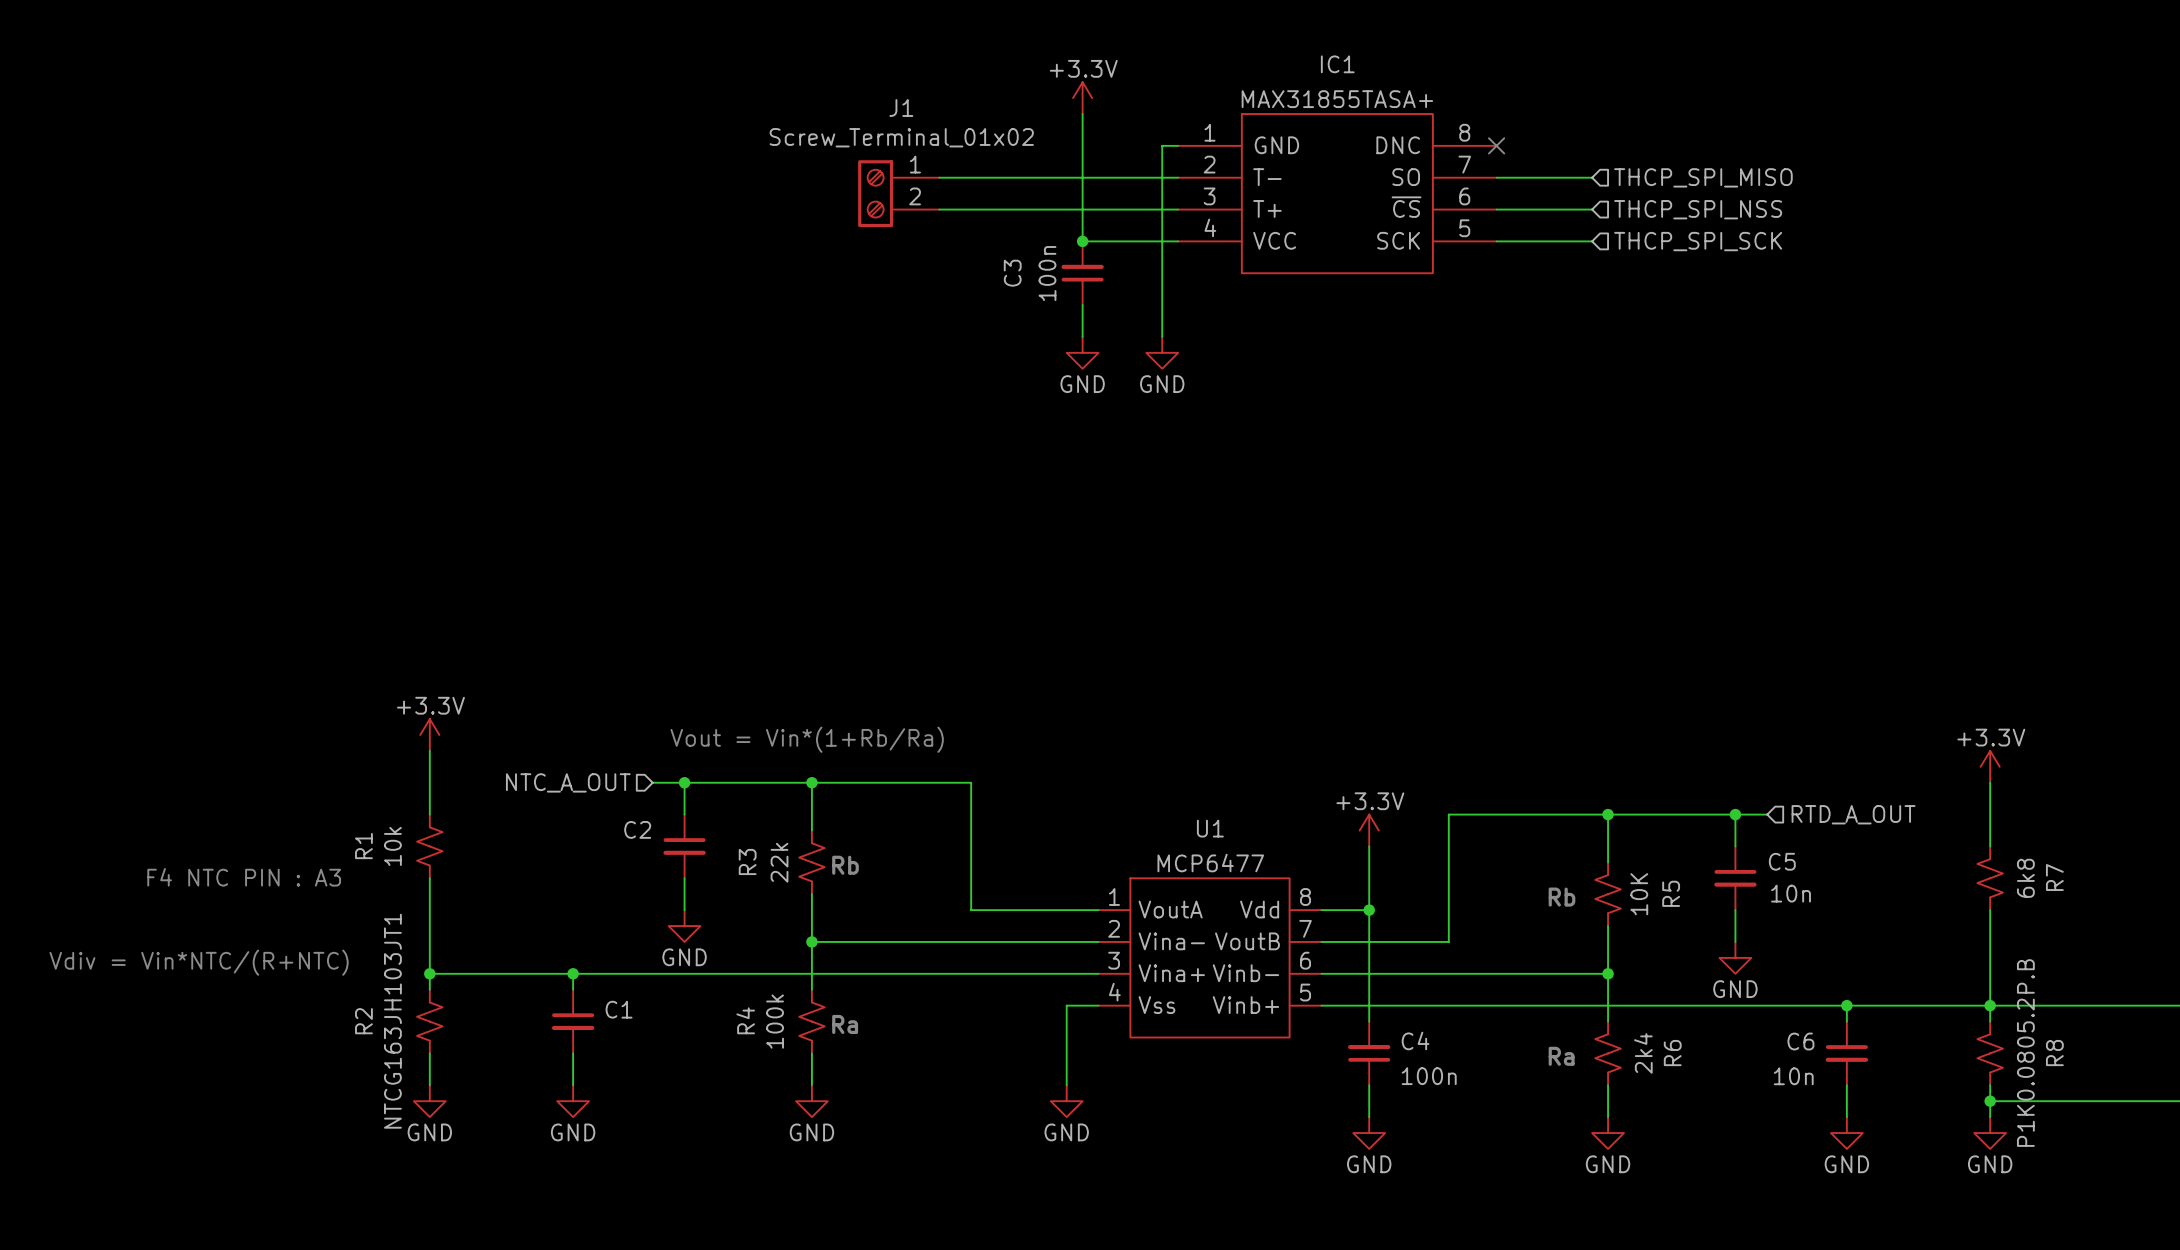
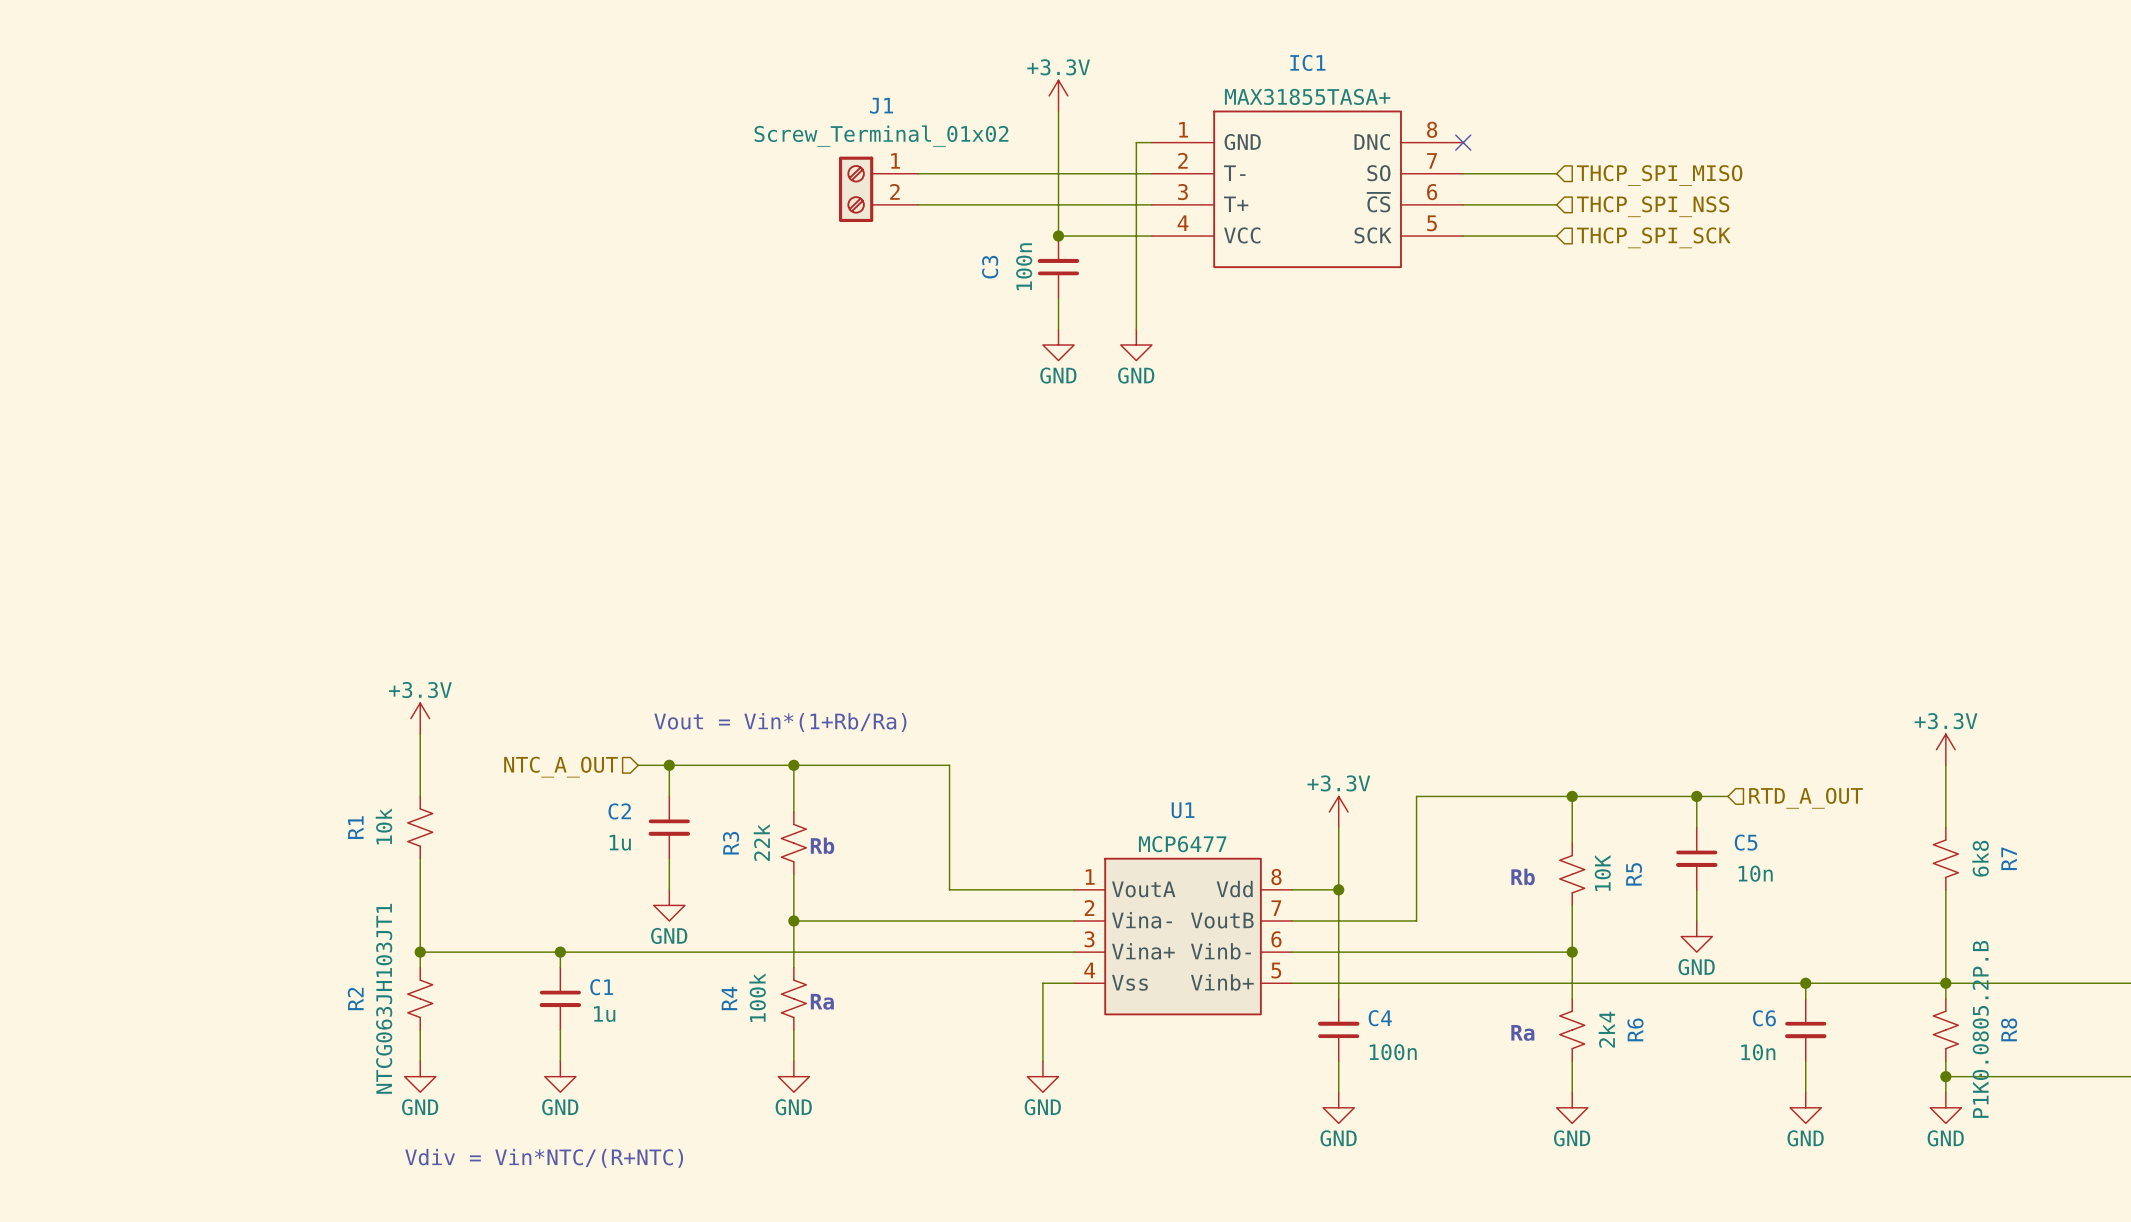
C2 value: none -> 1u (620, 842)
text: F4 NTC PIN : A3 (244, 877) -> none
text: Vdiv = Vin*NTC/(R+NTC) (199, 962) -> none
R2 value: NTCG163JH103JT1 (392, 1021) -> NTCG063JH103JT1 (384, 998)
C1 value: none -> 1u (604, 1014)
text: none -> Vdiv = Vin*NTC/(R+NTC) (544, 1158)

